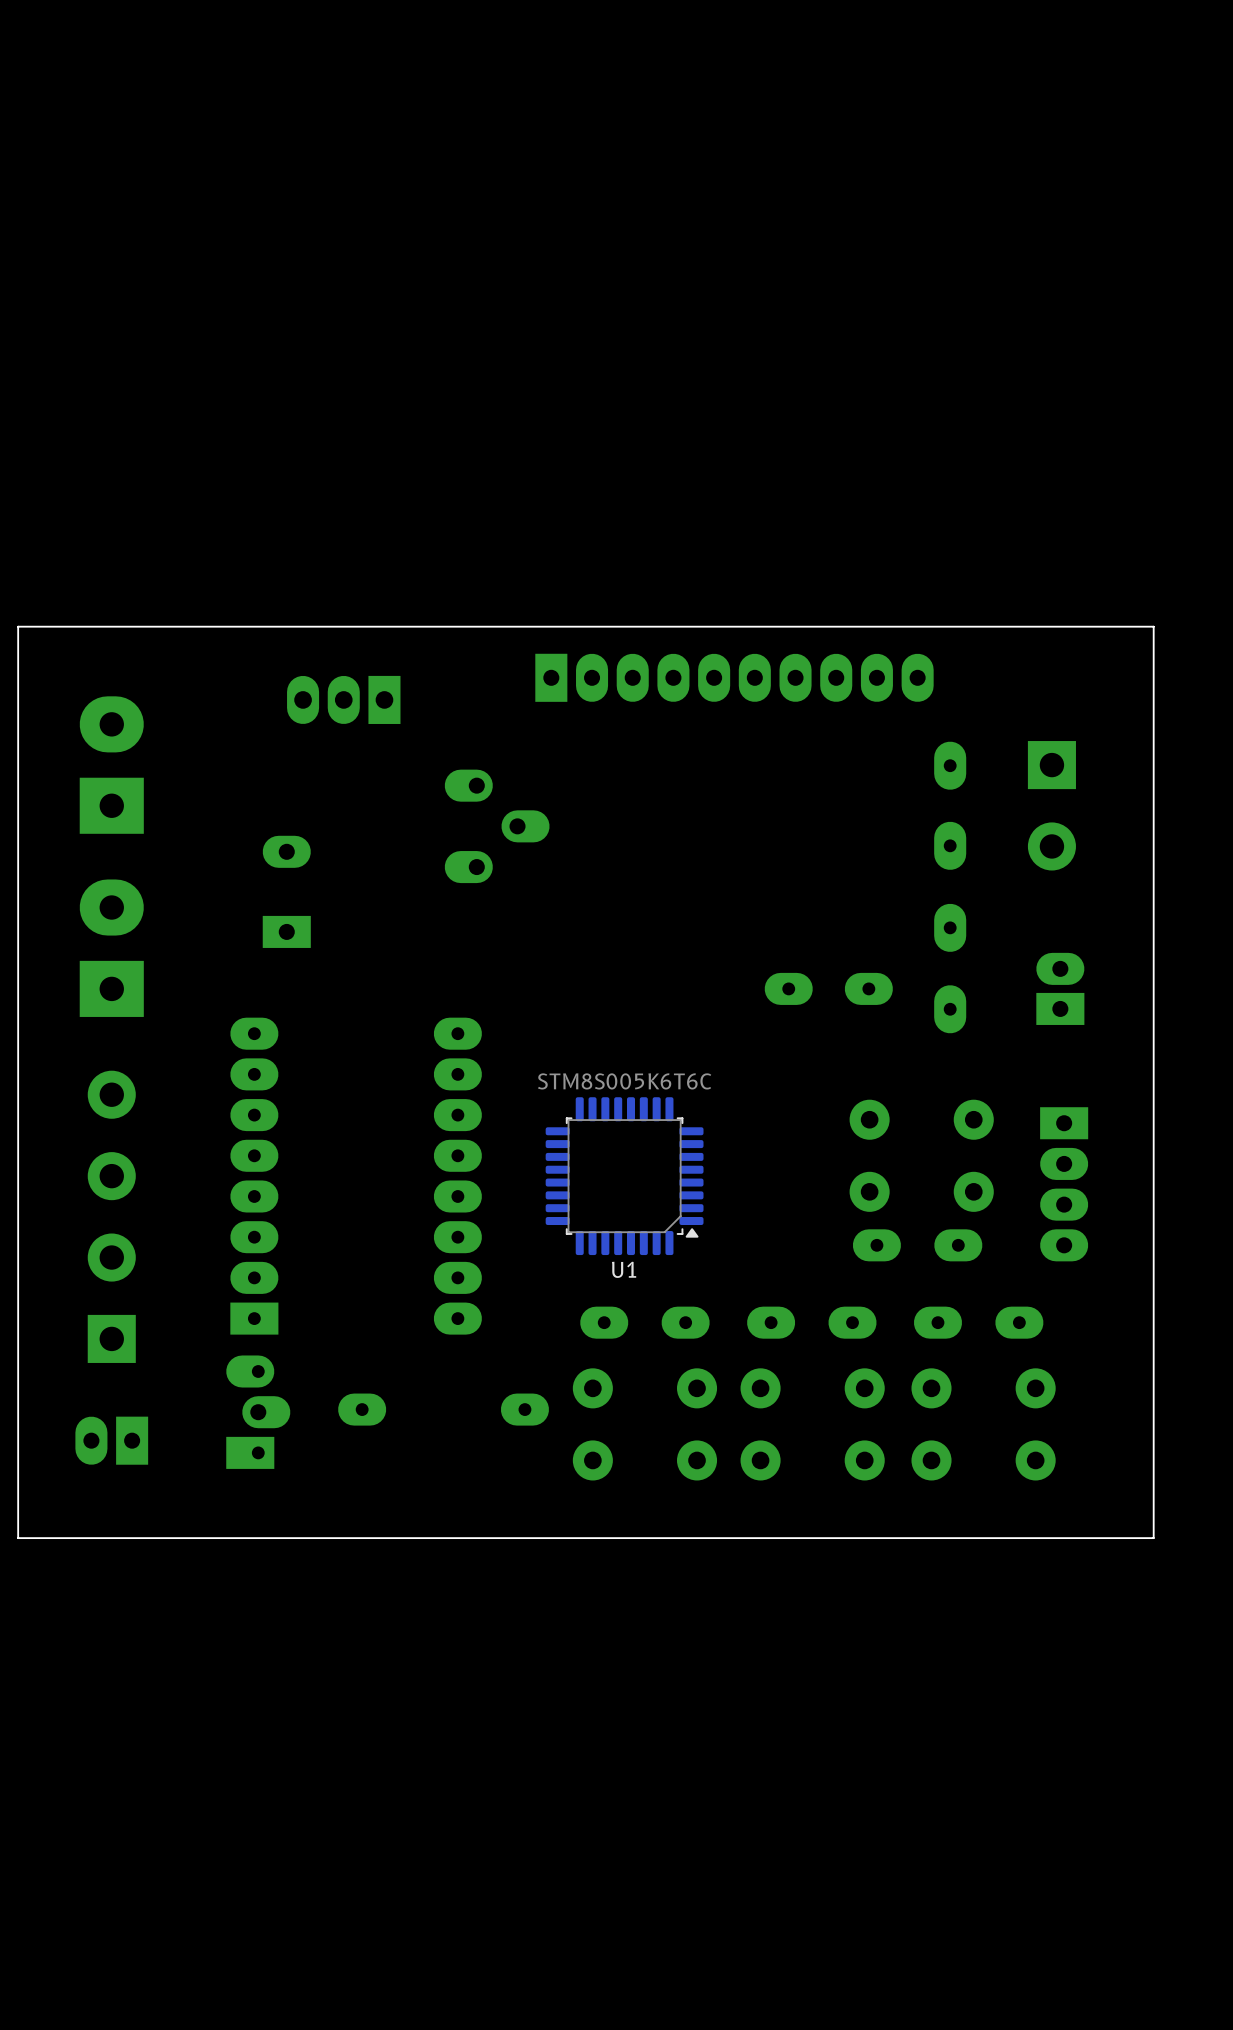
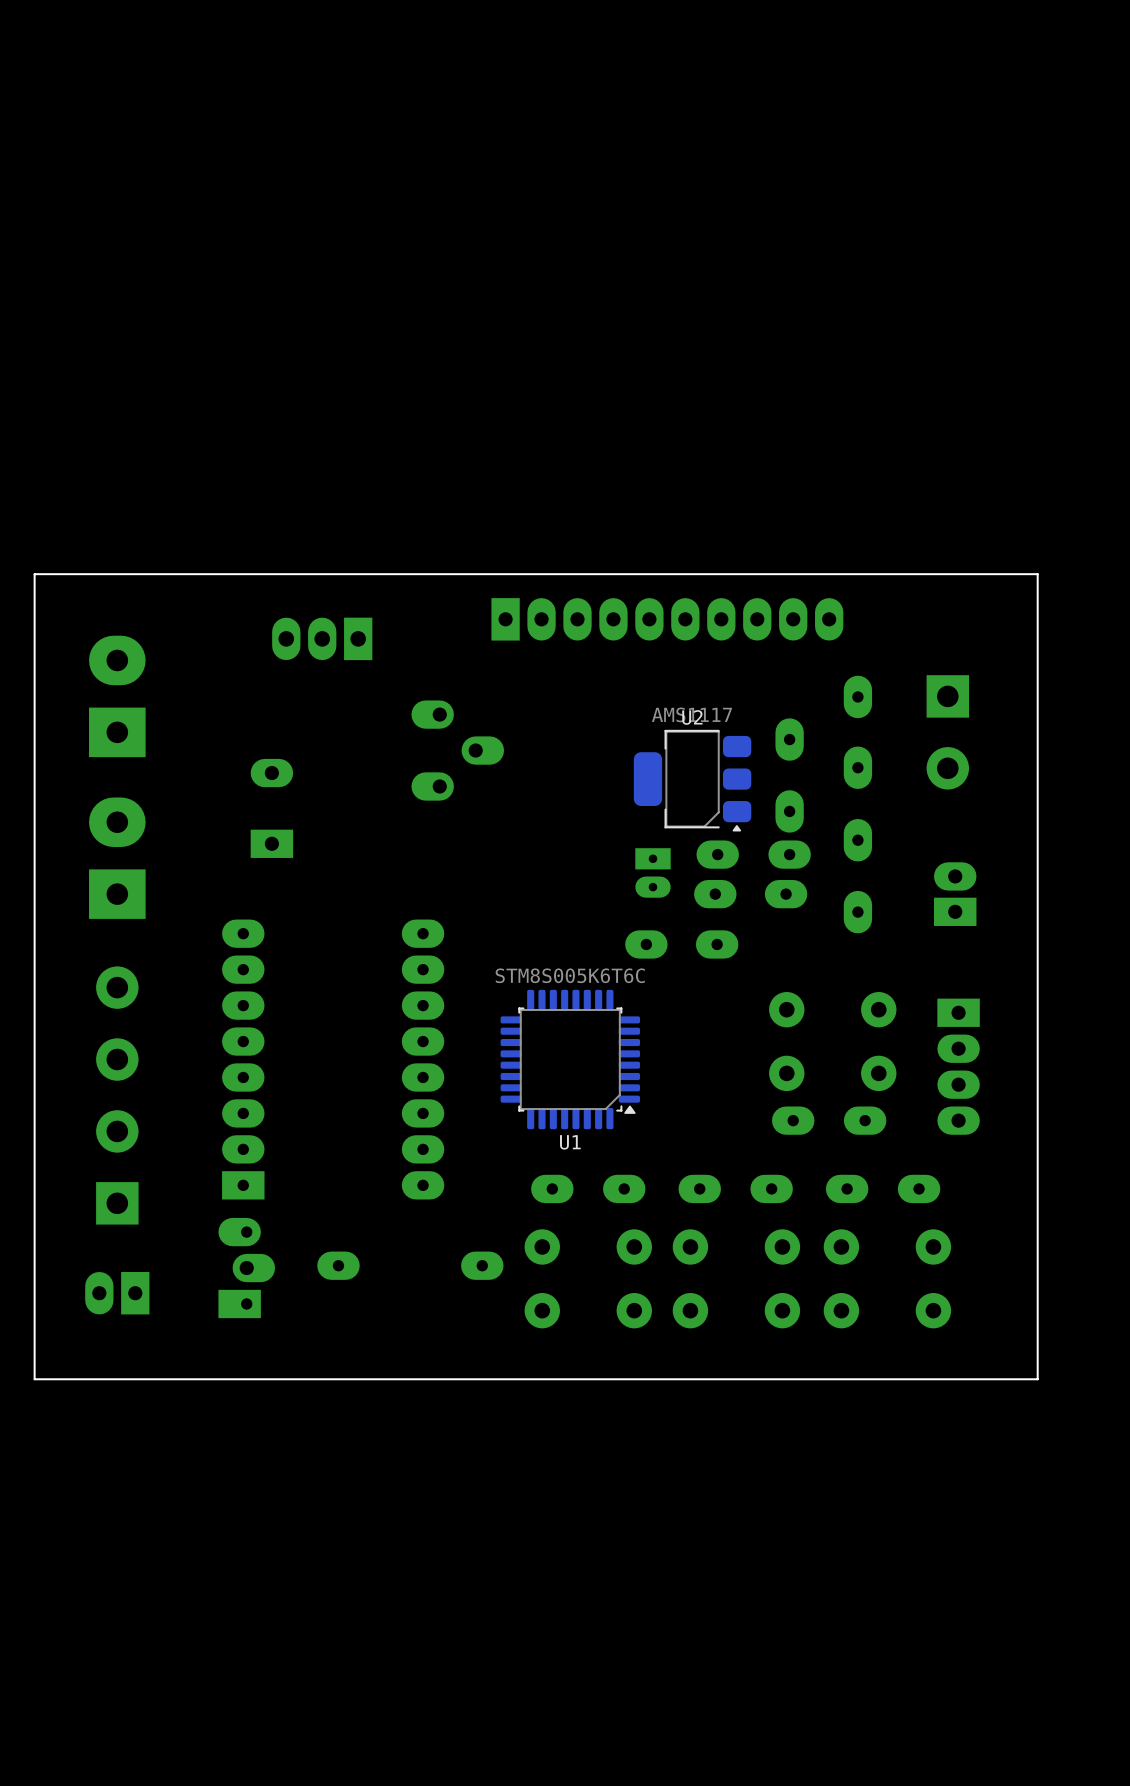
part: none -> (789, 775)
U2: none -> AMS1117 (692, 780)
part: none -> (753, 854)
part: none -> (653, 872)
part: none -> (681, 944)

